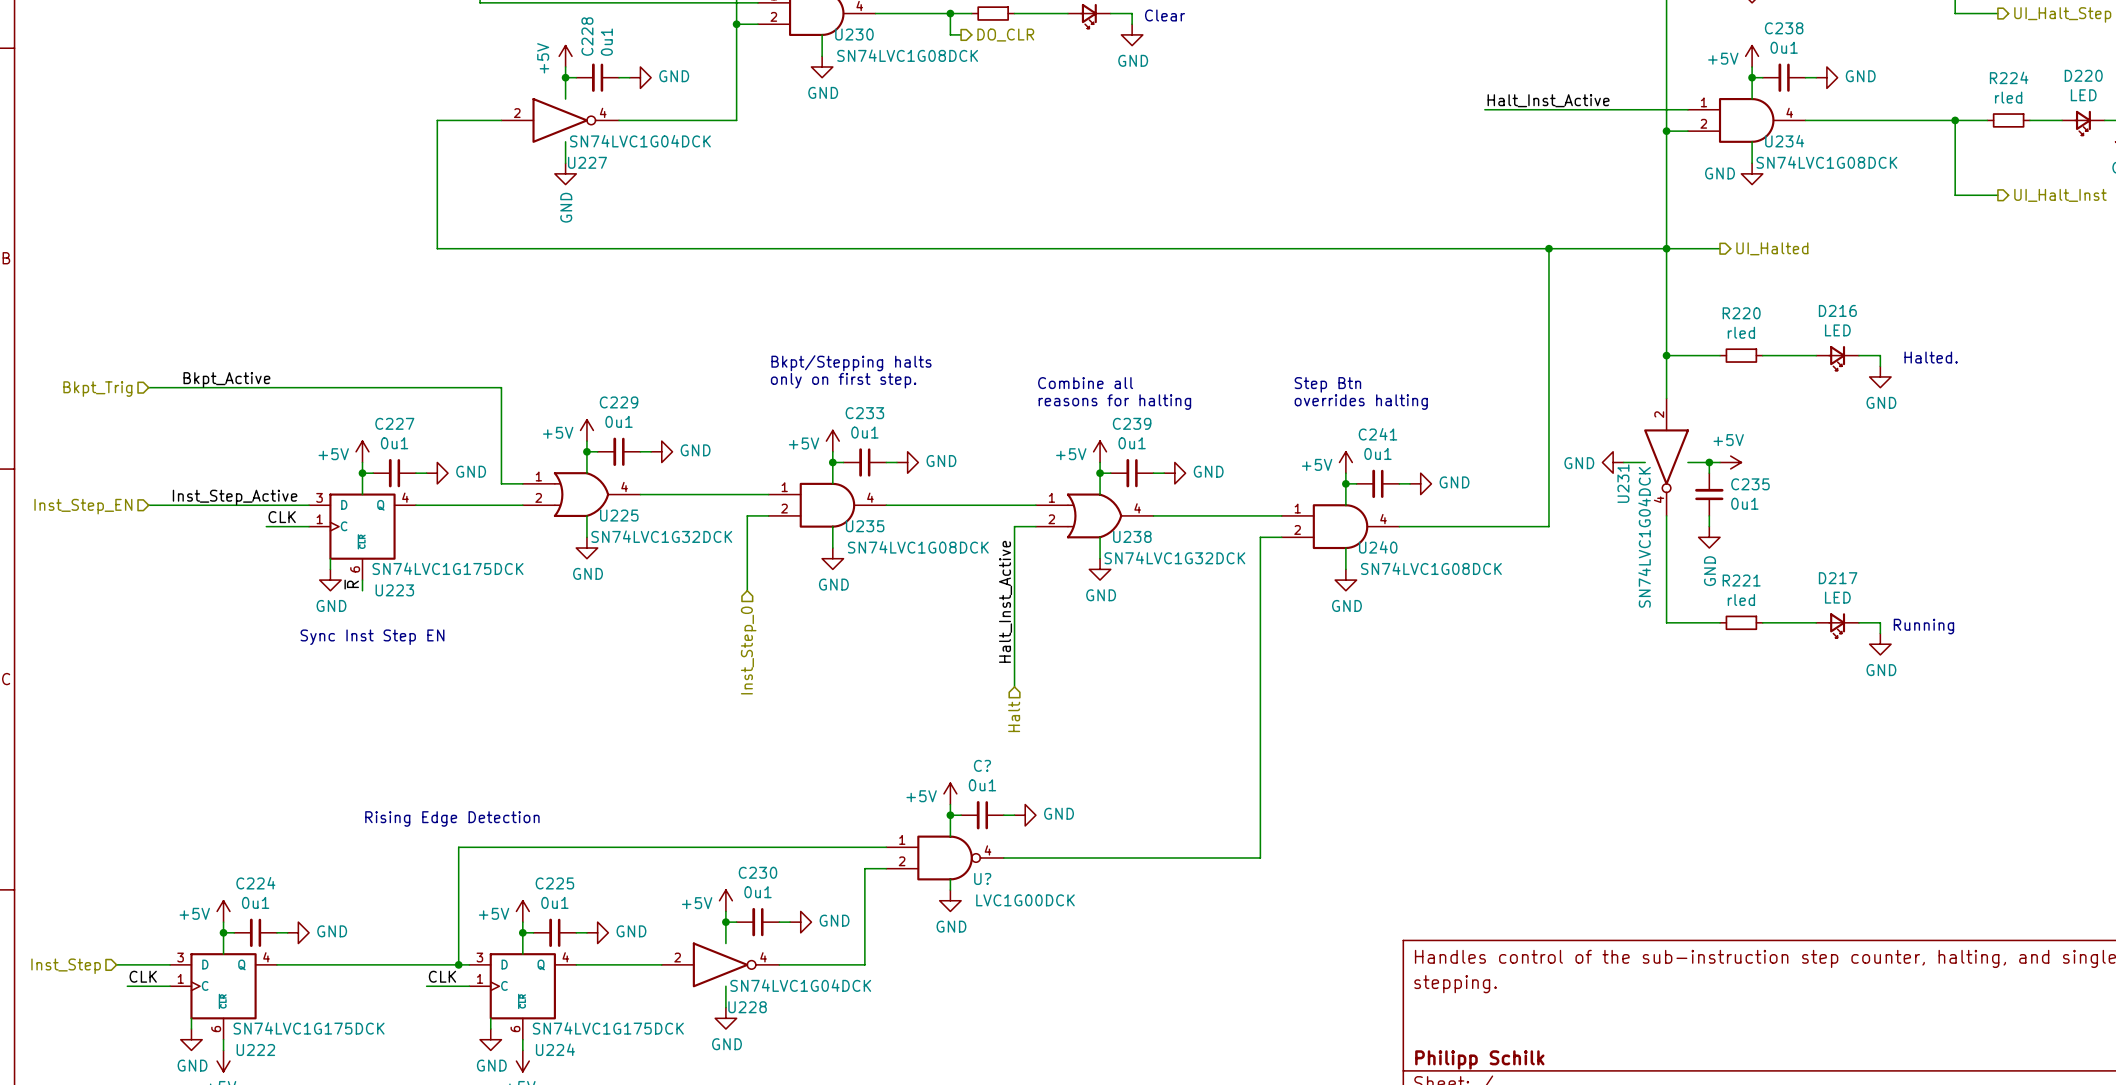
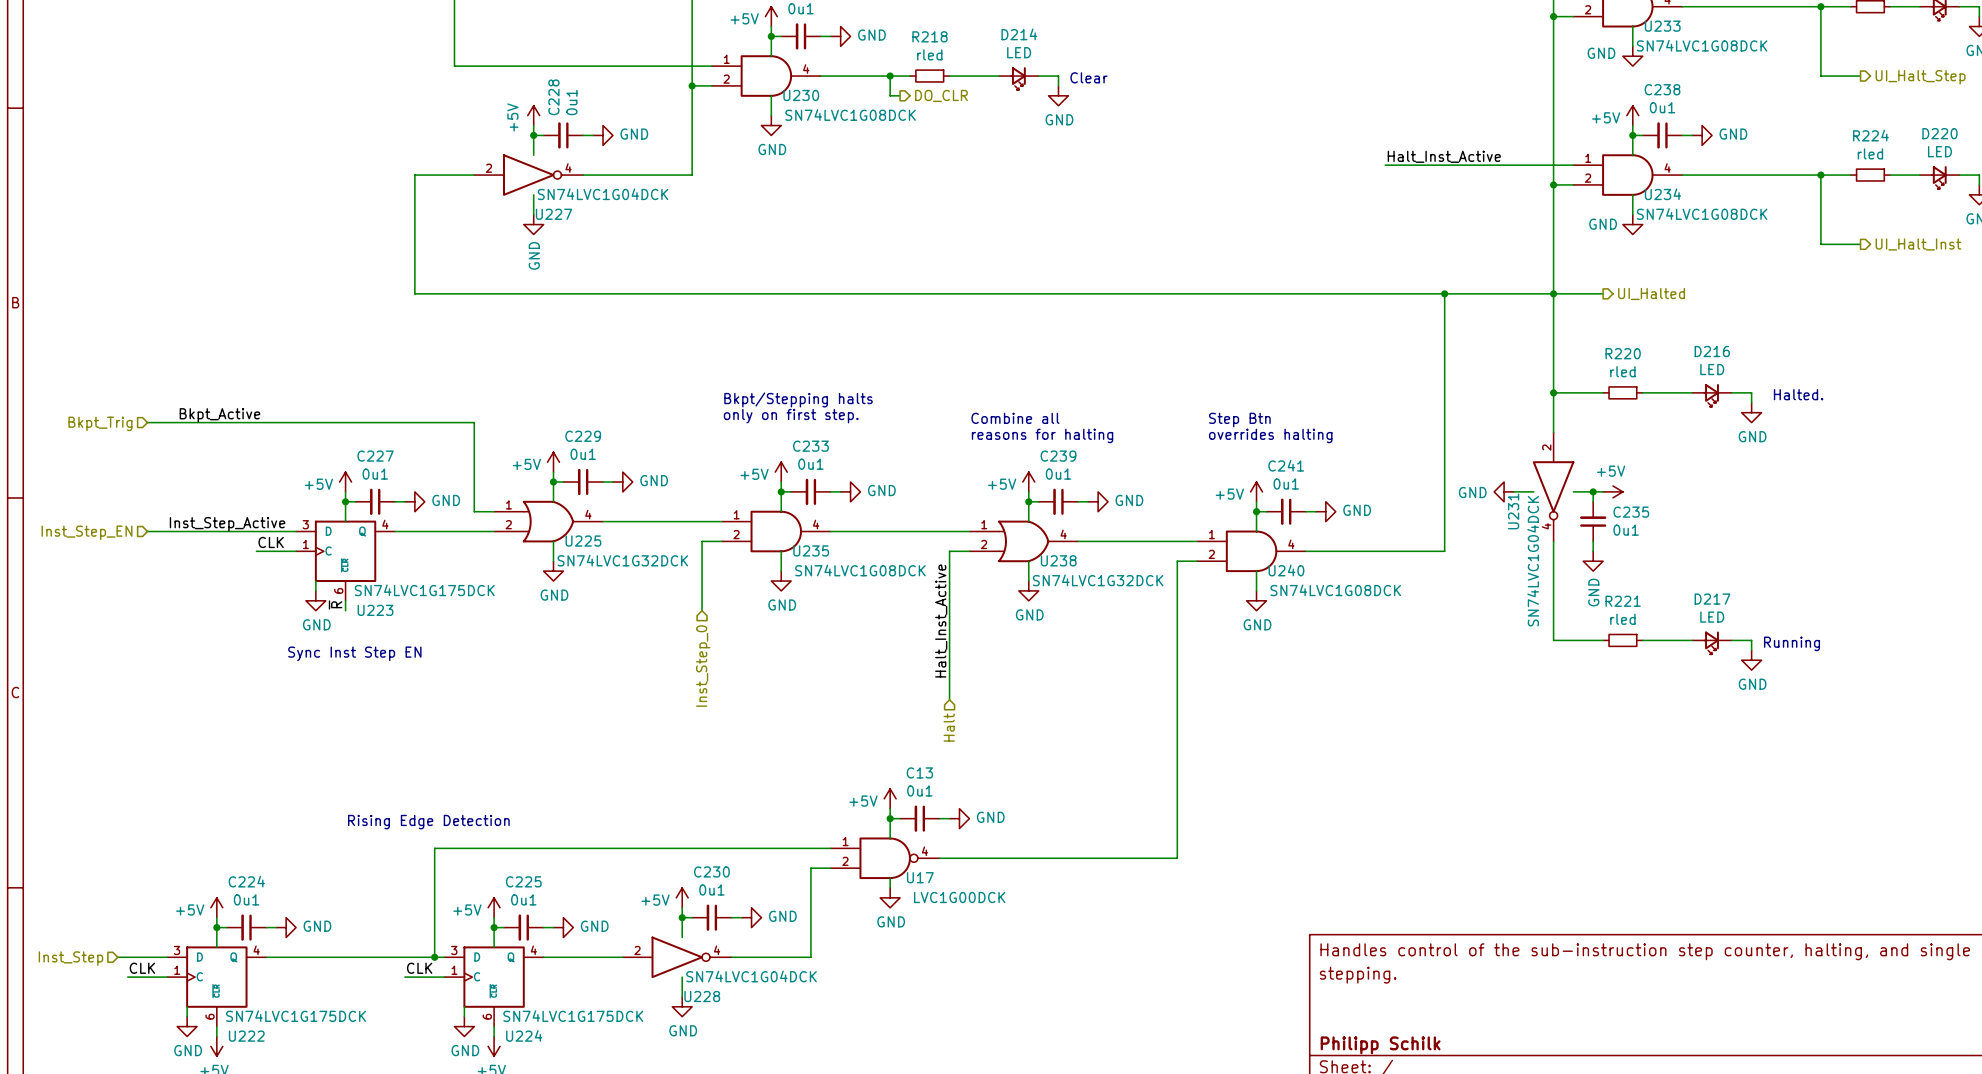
C? name: C? (982, 765) -> C13 (919, 772)
U? name: U? (982, 878) -> U17 (920, 877)

